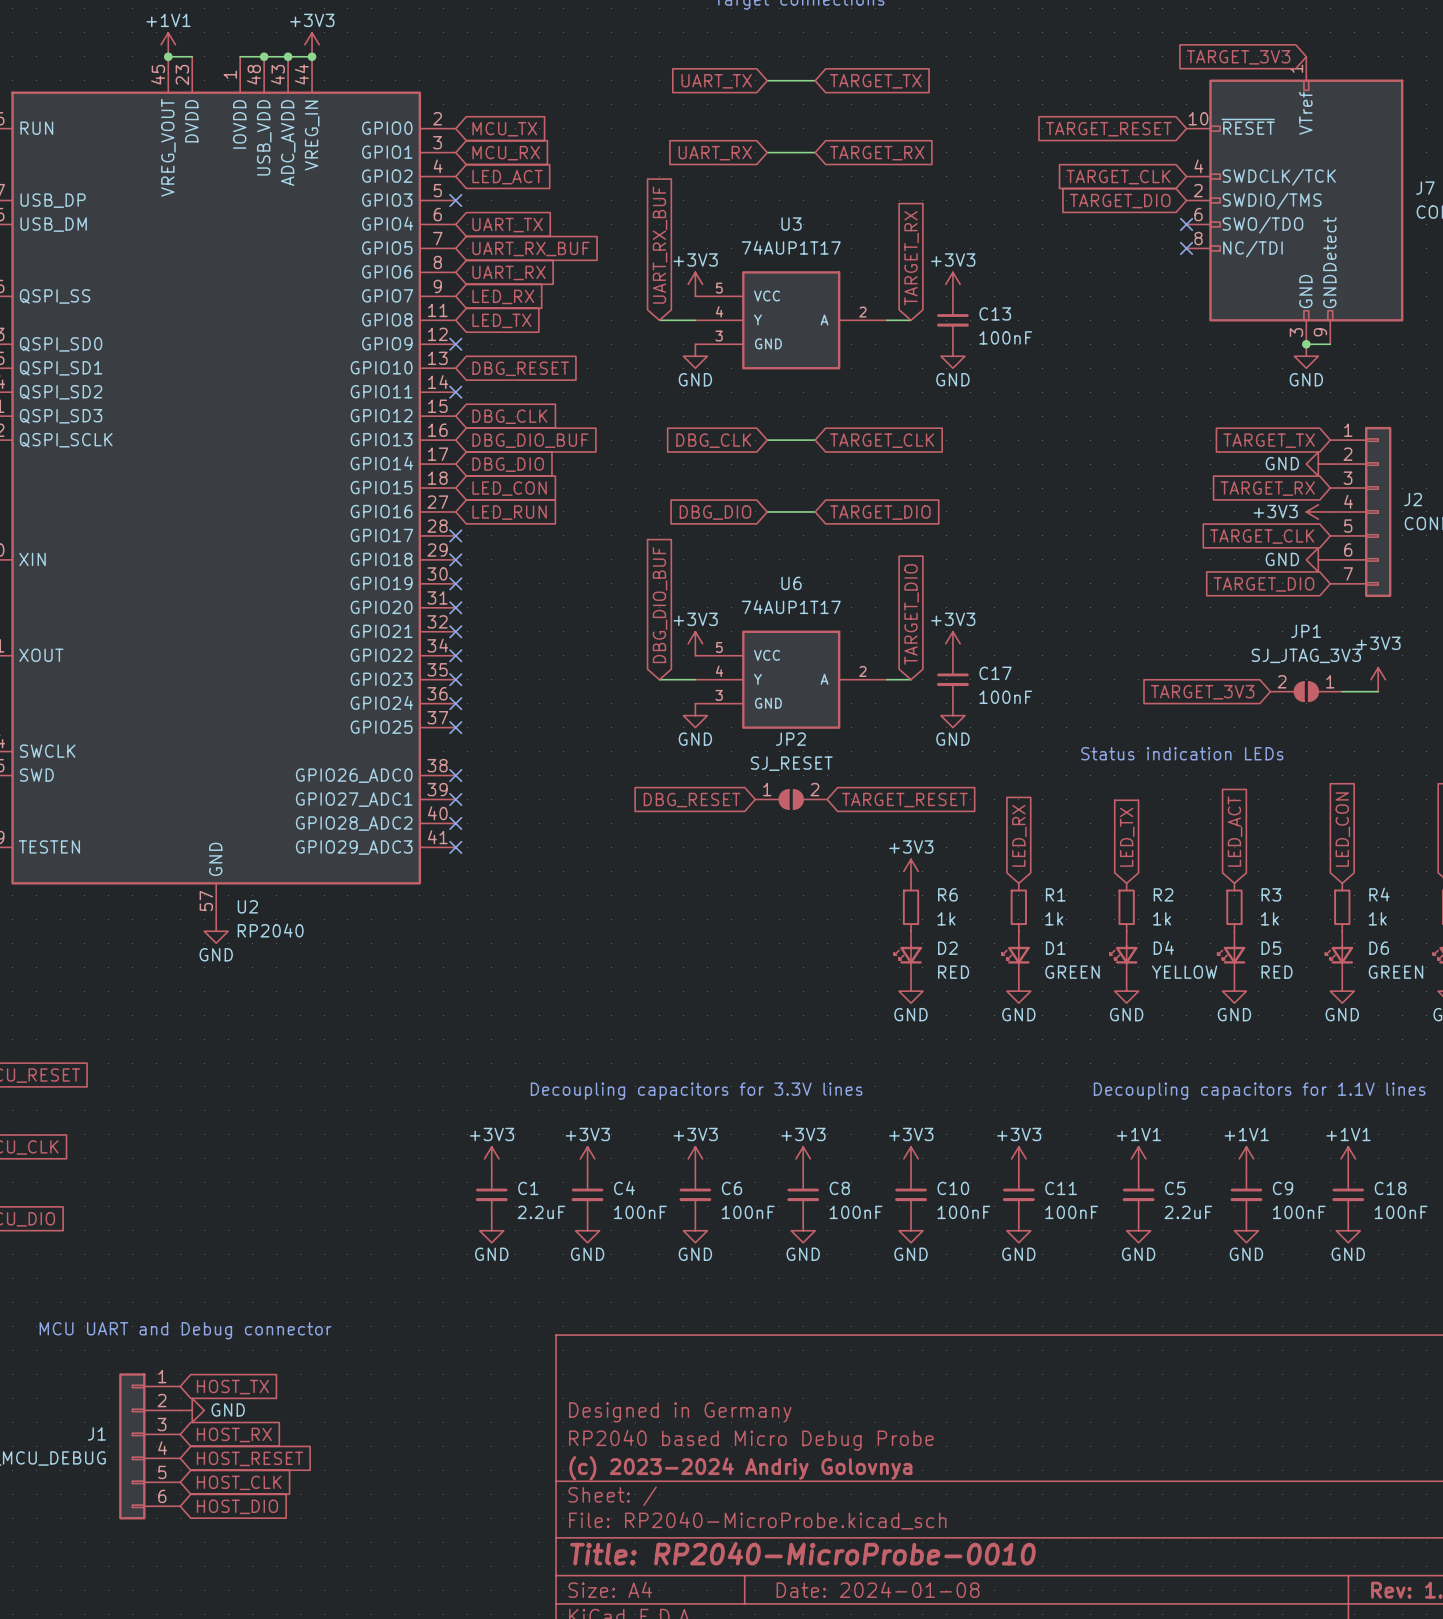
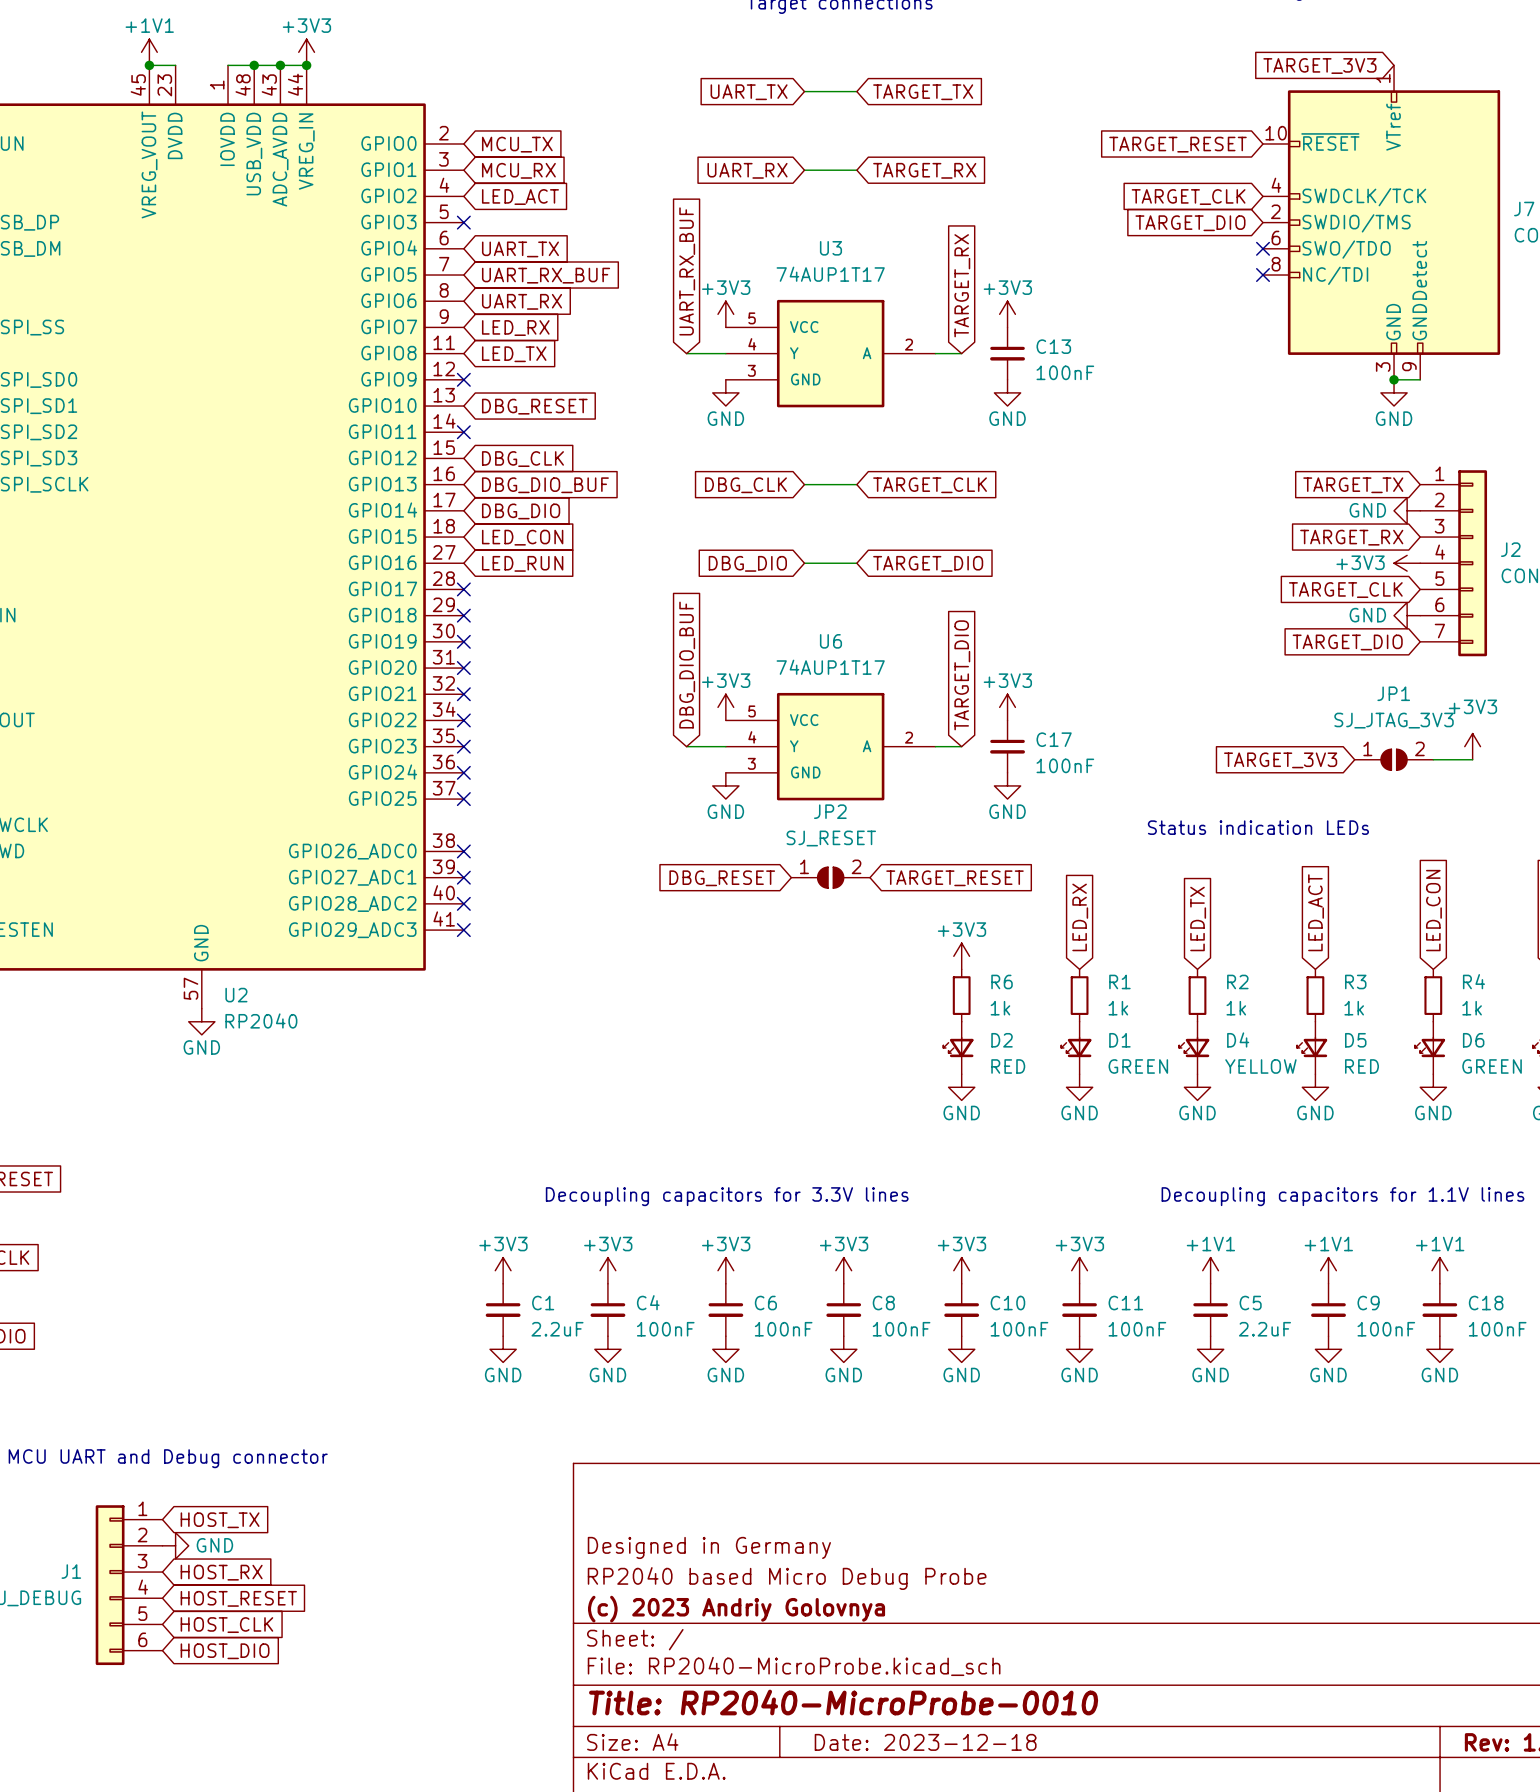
JP1 rotation: 0° (1306, 691) -> 180° (1394, 759)
title block: (c) 2023-2024 Andriy Golovnya (740, 1468) -> (c) 2023 Andriy Golovnya (736, 1609)
title block: Date: 2024-01-08 (878, 1589) -> Date: 2023-12-18 (925, 1742)

